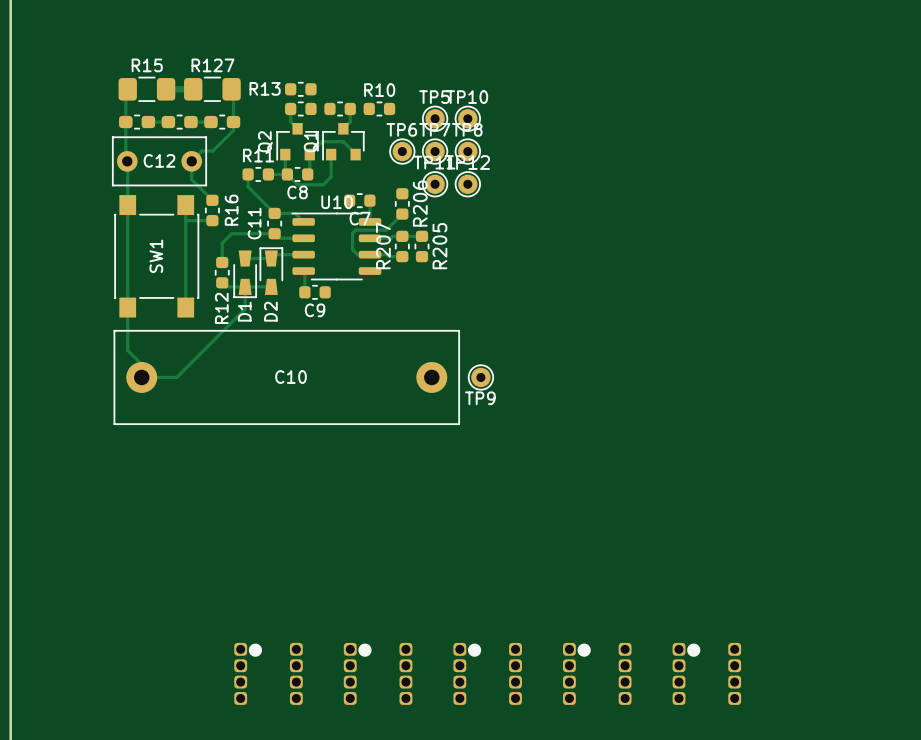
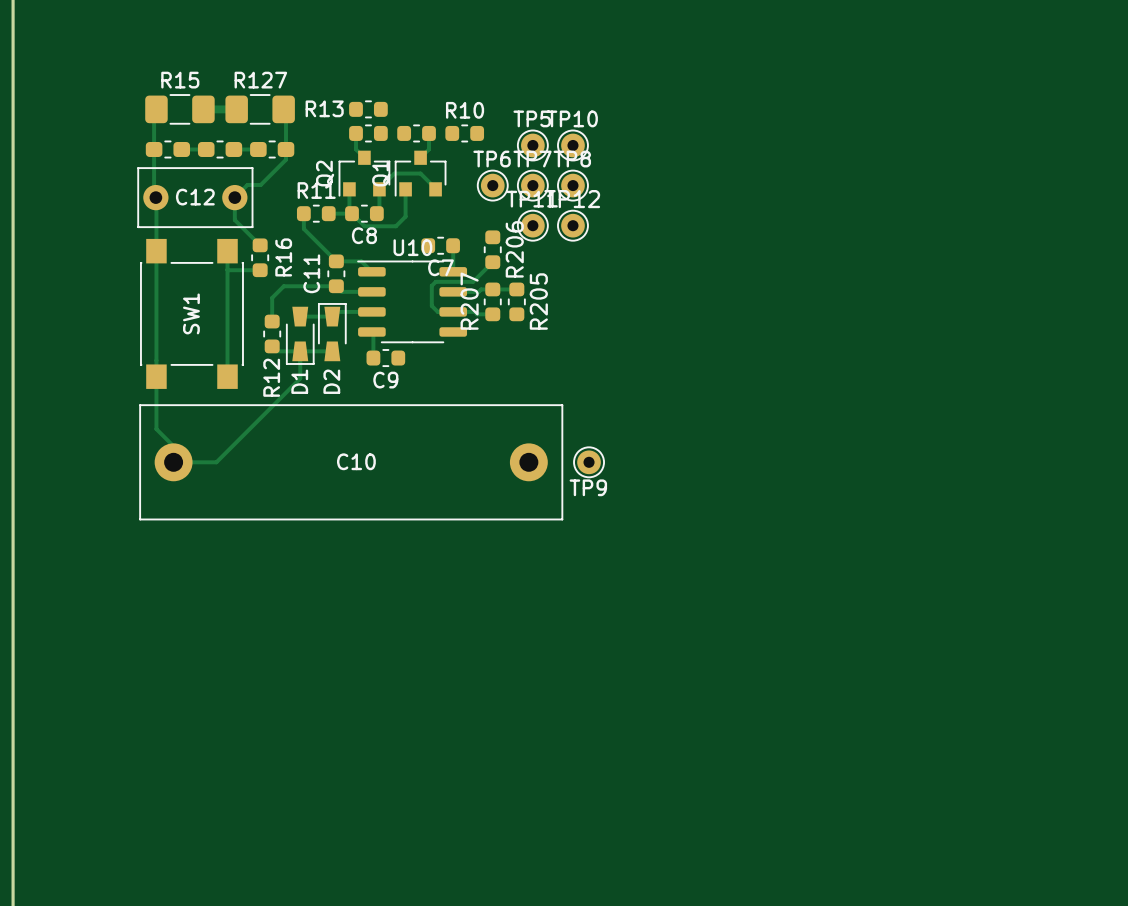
part: (268, 673) -> none
part: (378, 673) -> none
part: (487, 673) -> none
part: (597, 673) -> none
part: (706, 673) -> none

